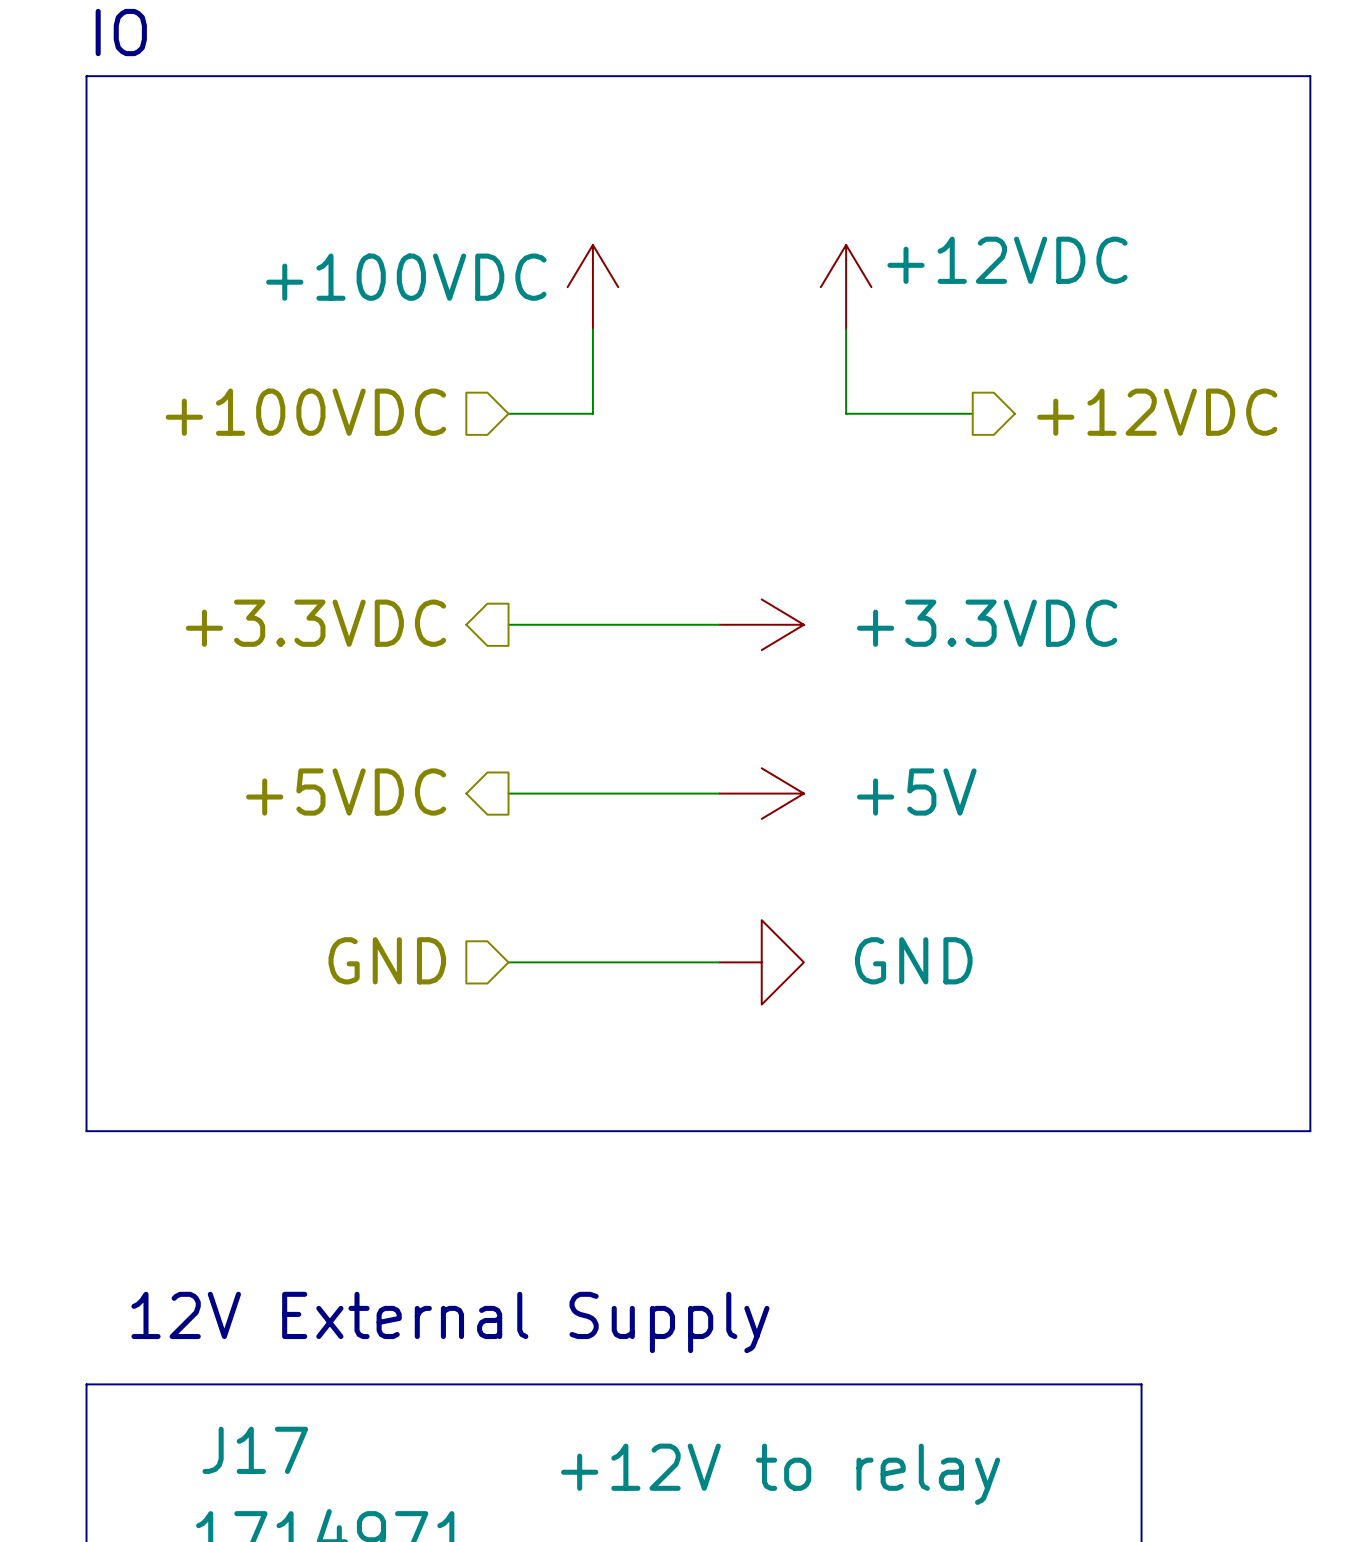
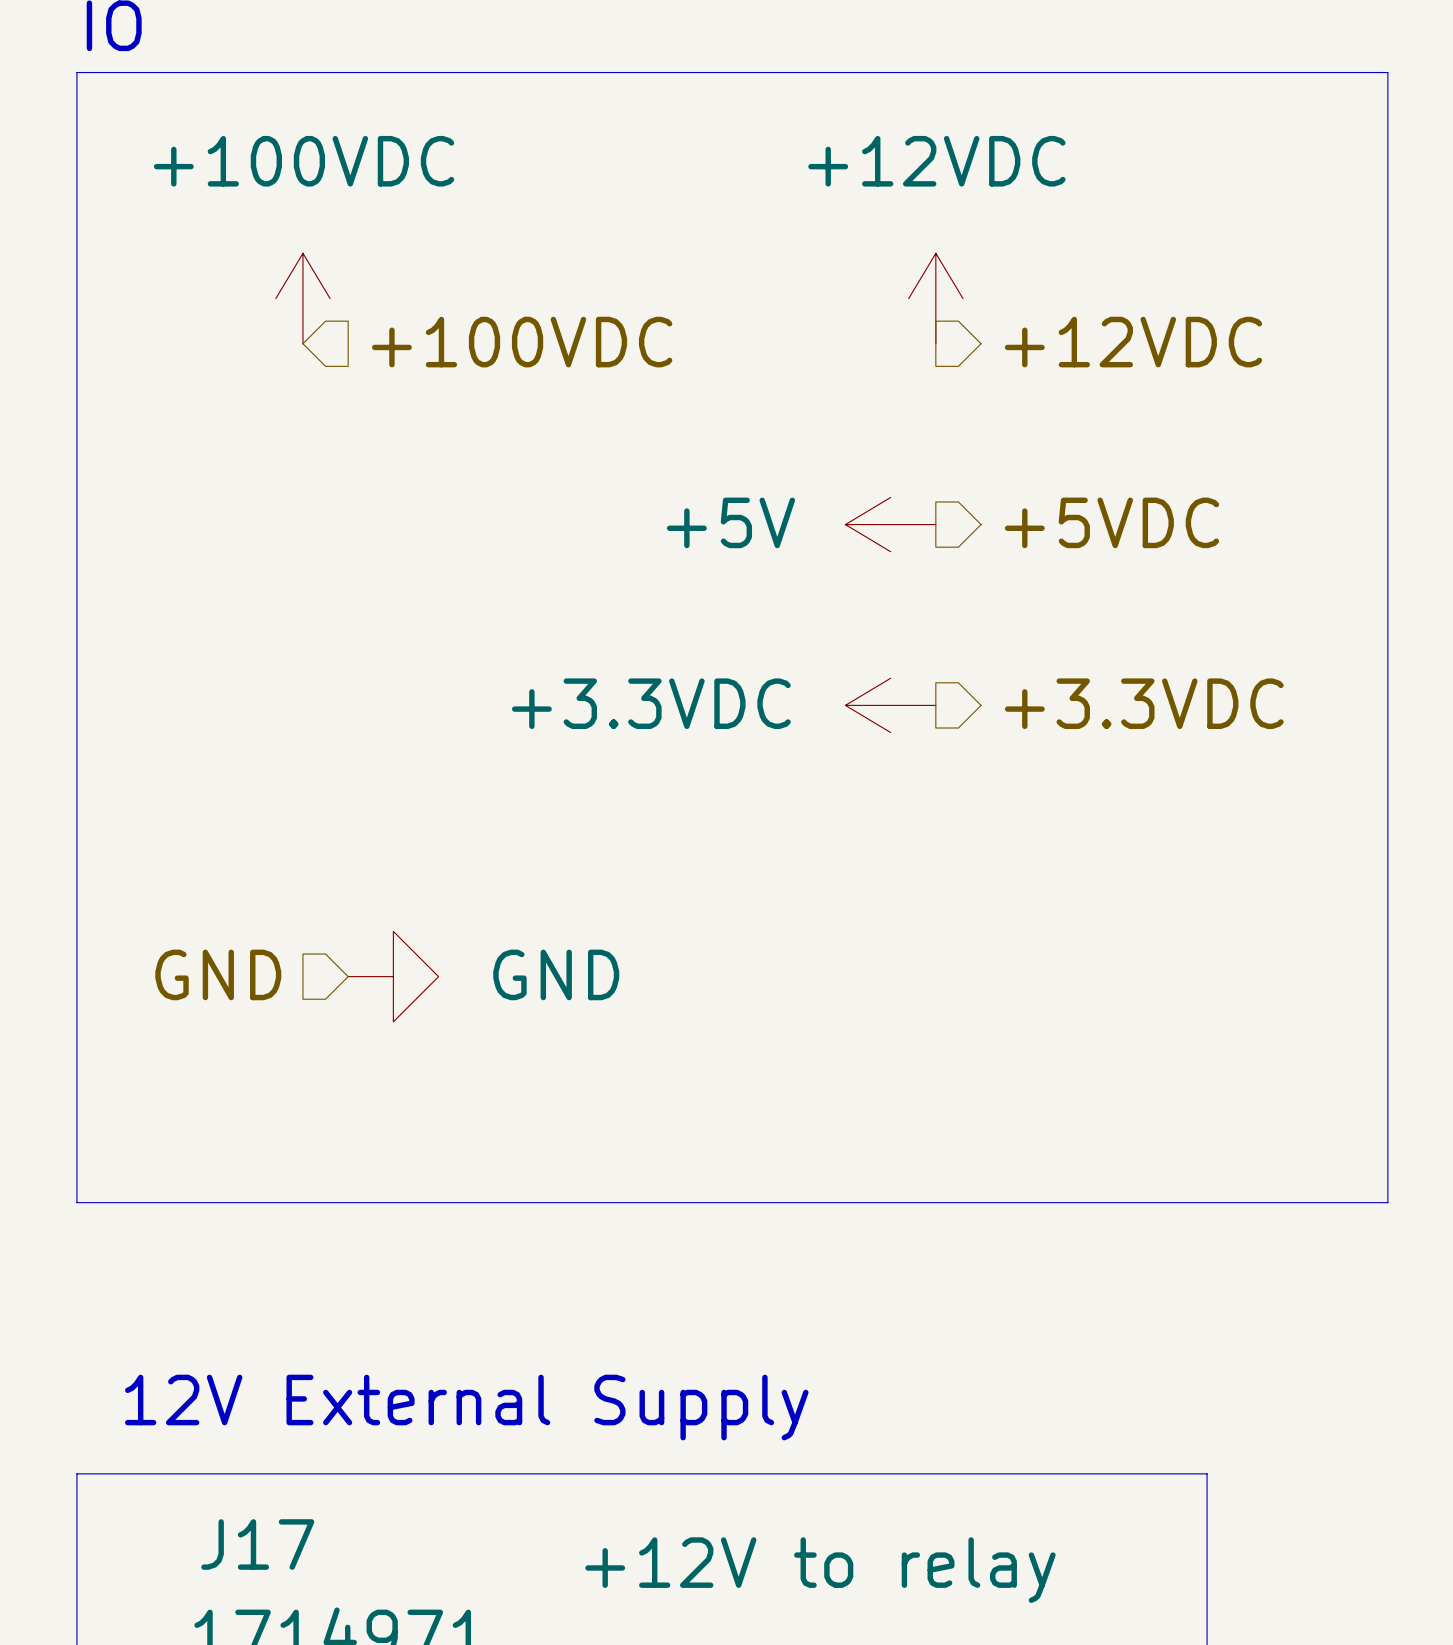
power symbol text position: +12VDC (1007, 260) -> +12VDC (936, 161)
power symbol text position: +100VDC (406, 277) -> +100VDC (304, 161)
power symbol position: +100VDC (592, 287) -> +100VDC (302, 298)
power symbol position: +12VDC (846, 287) -> +12VDC (935, 298)
wire: (592, 329) (592, 413) (508, 413) -> none
wire: (846, 329) (846, 413) (972, 413) -> none
hierarchical label rotation: 0° (305, 412) -> 180° (522, 342)
hierarchical label position: +12VDC (1157, 412) -> +12VDC (1133, 342)
hierarchical label rotation: 0° (315, 623) -> 180° (1144, 703)
hierarchical label position: +3.3VDC (315, 623) -> +3.3VDC (1144, 703)
wire: (508, 624) (719, 624) -> none
power symbol rotation: 0° (761, 624) -> 180° (890, 705)
power symbol position: +3.3VDC (761, 624) -> +3.3VDC (890, 705)
hierarchical label rotation: 0° (346, 792) -> 180° (1111, 522)
hierarchical label position: +5VDC (346, 792) -> +5VDC (1111, 522)
wire: (508, 793) (719, 793) -> none
power symbol rotation: 0° (761, 793) -> 180° (890, 524)
power symbol position: +5V (761, 793) -> +5V (890, 524)
hierarchical label position: GND (387, 960) -> GND (218, 974)
wire: (508, 962) (719, 962) -> none
power symbol position: GND (761, 962) -> GND (393, 976)

